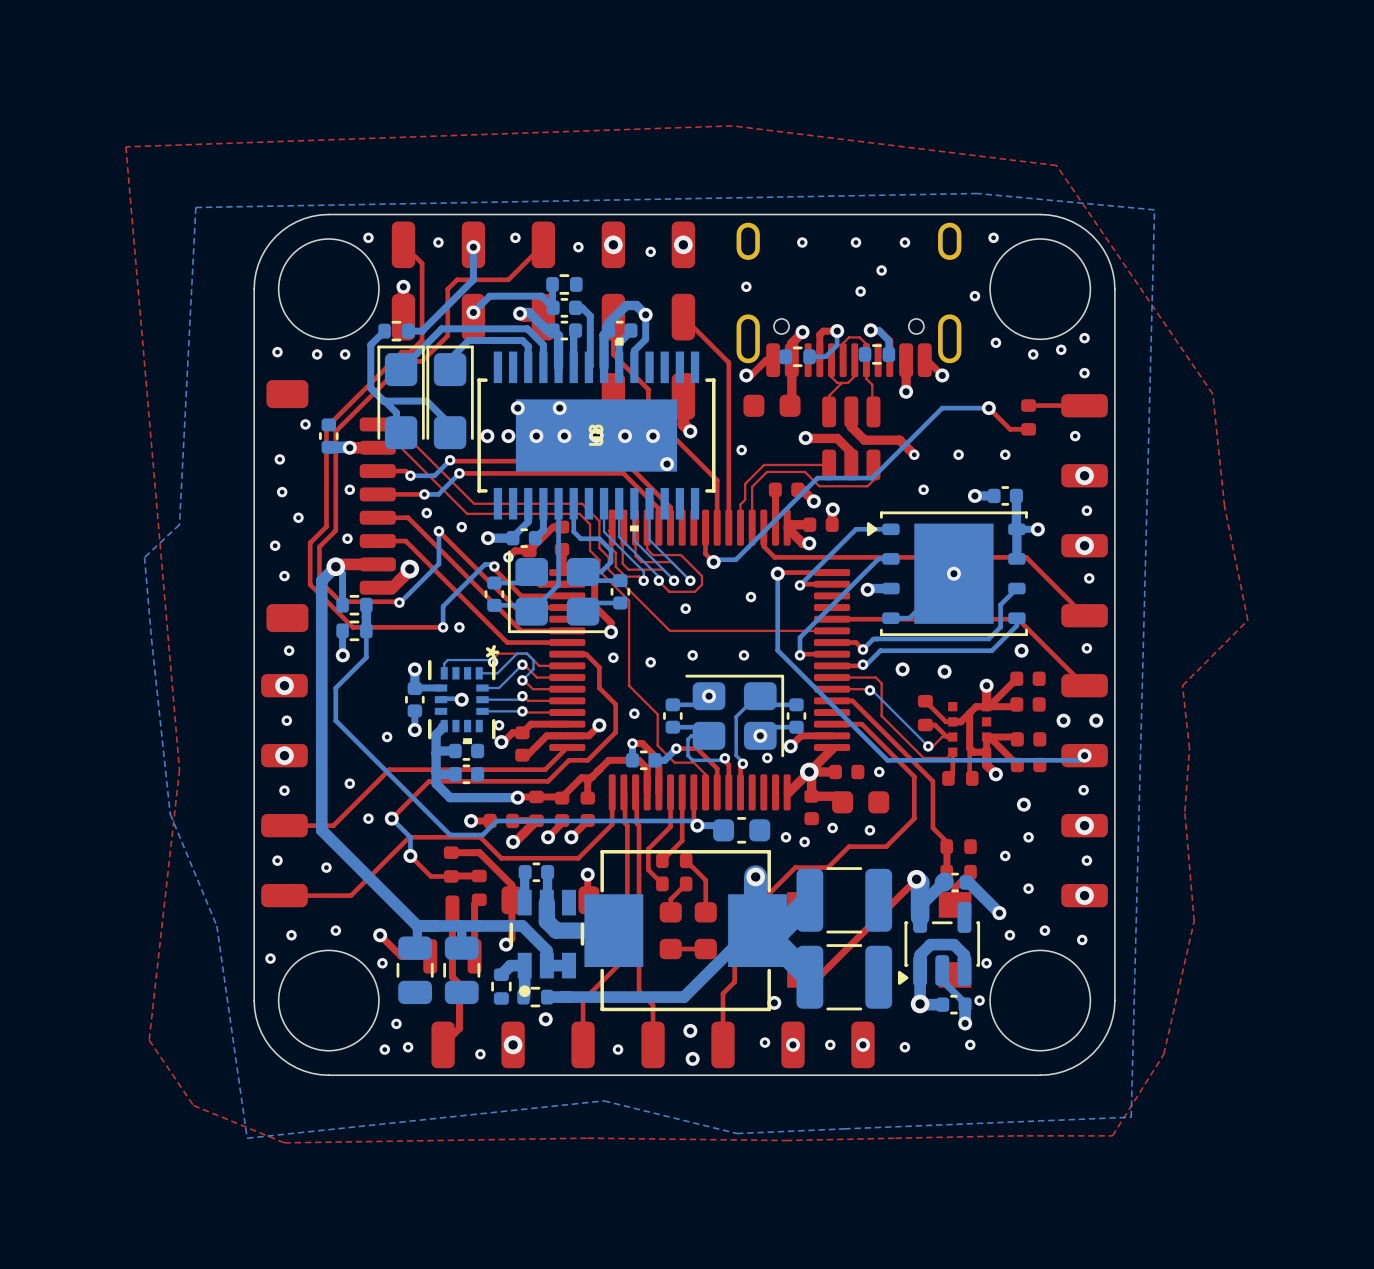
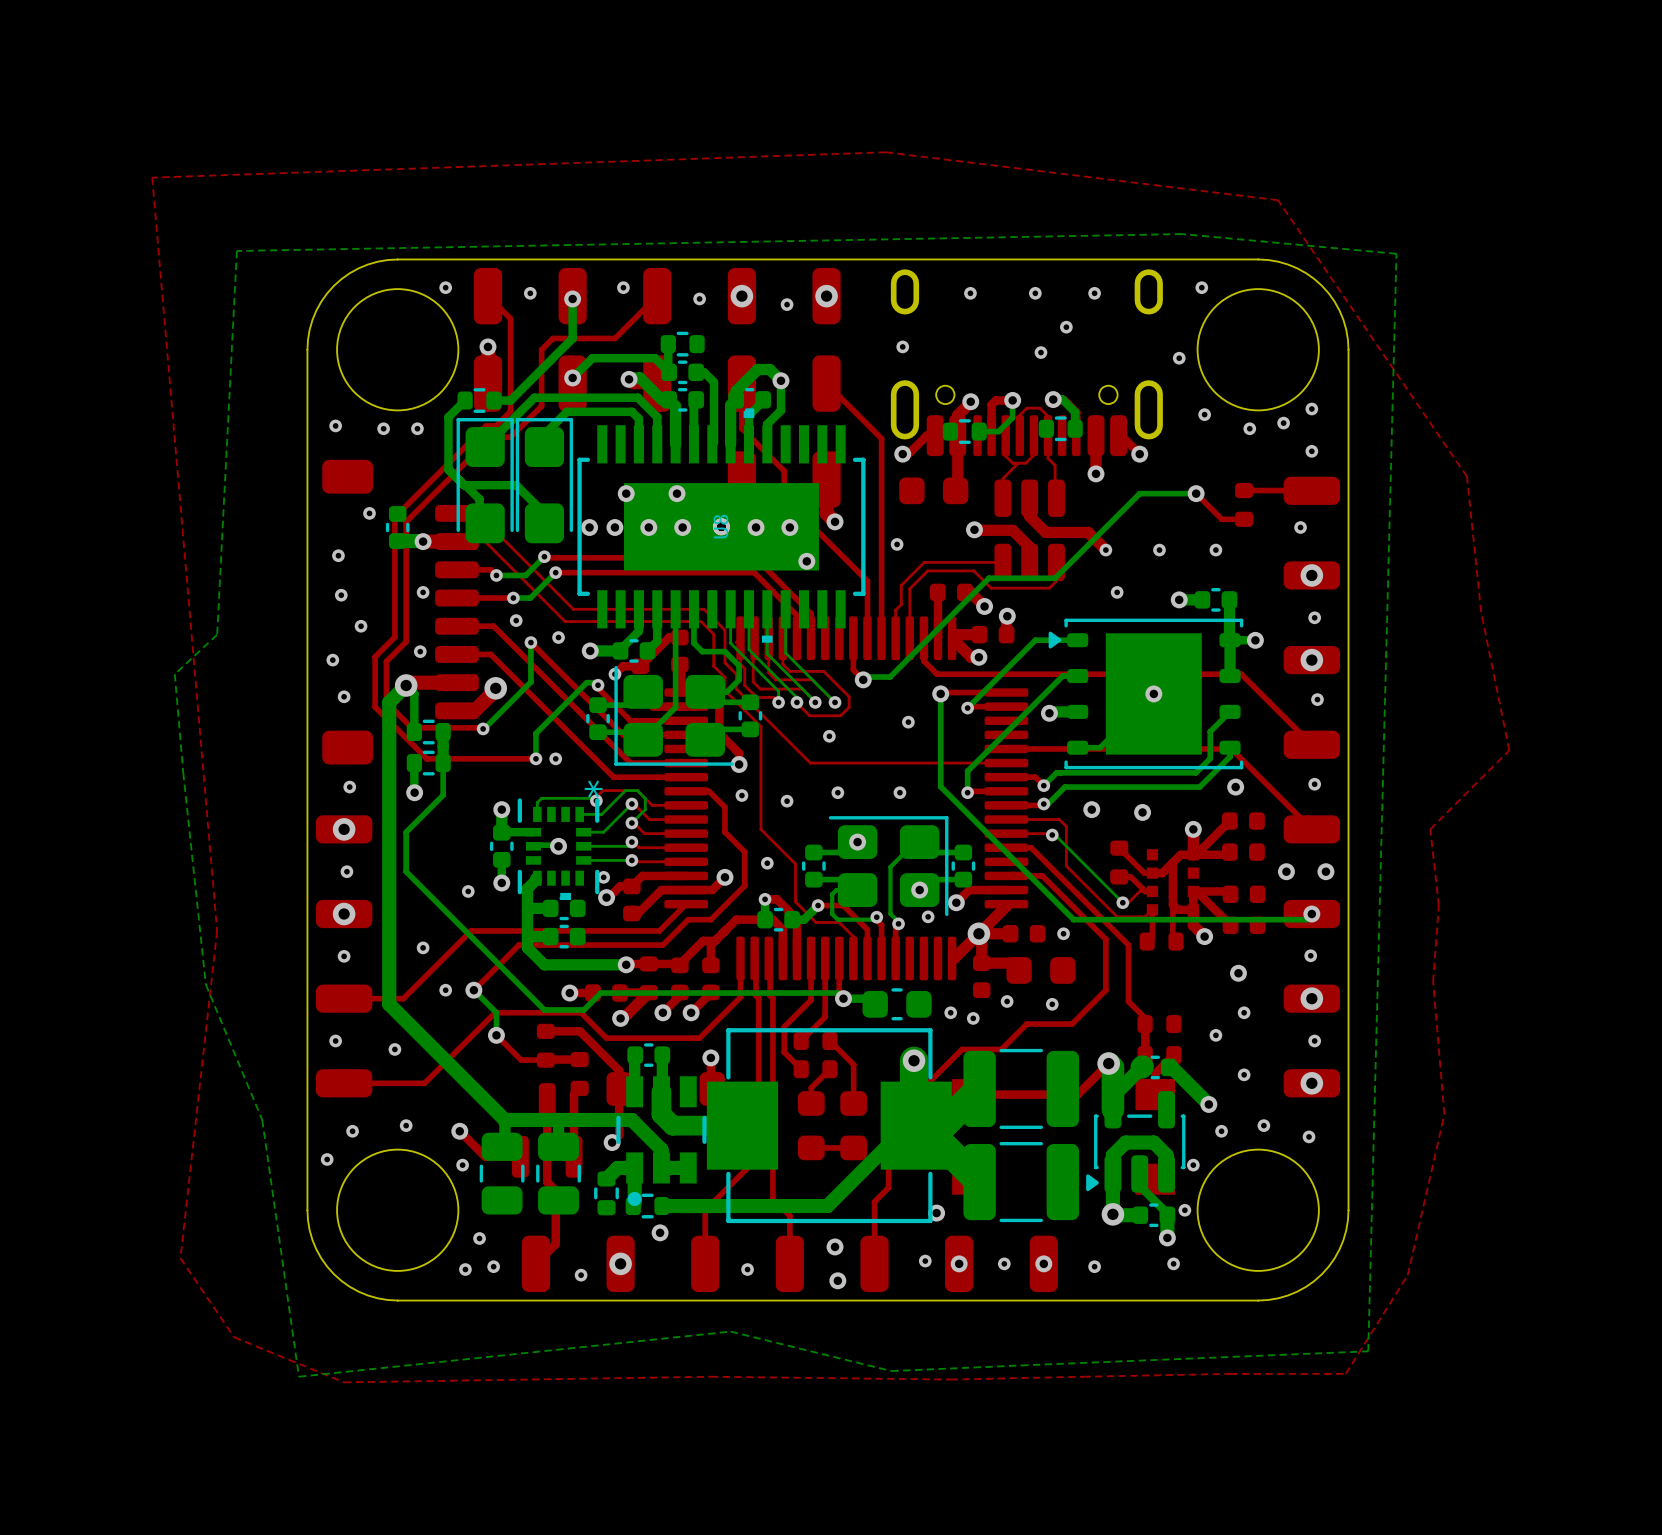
top track: (890, 904) (820, 974) (803, 974) -> (1077, 1094) (971, 1094)

